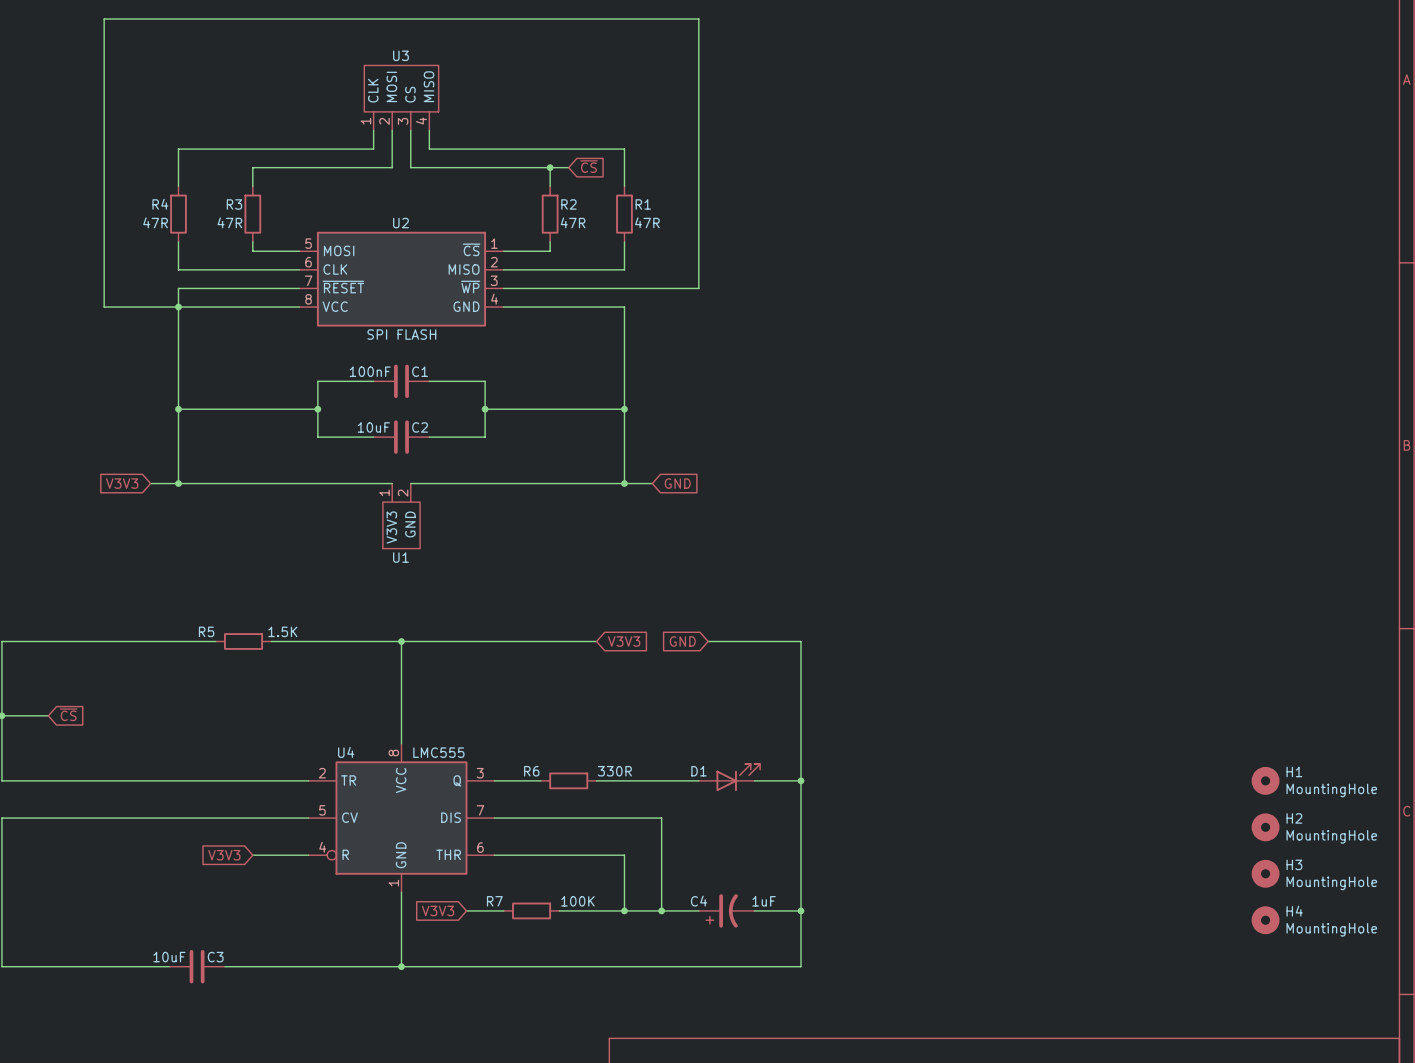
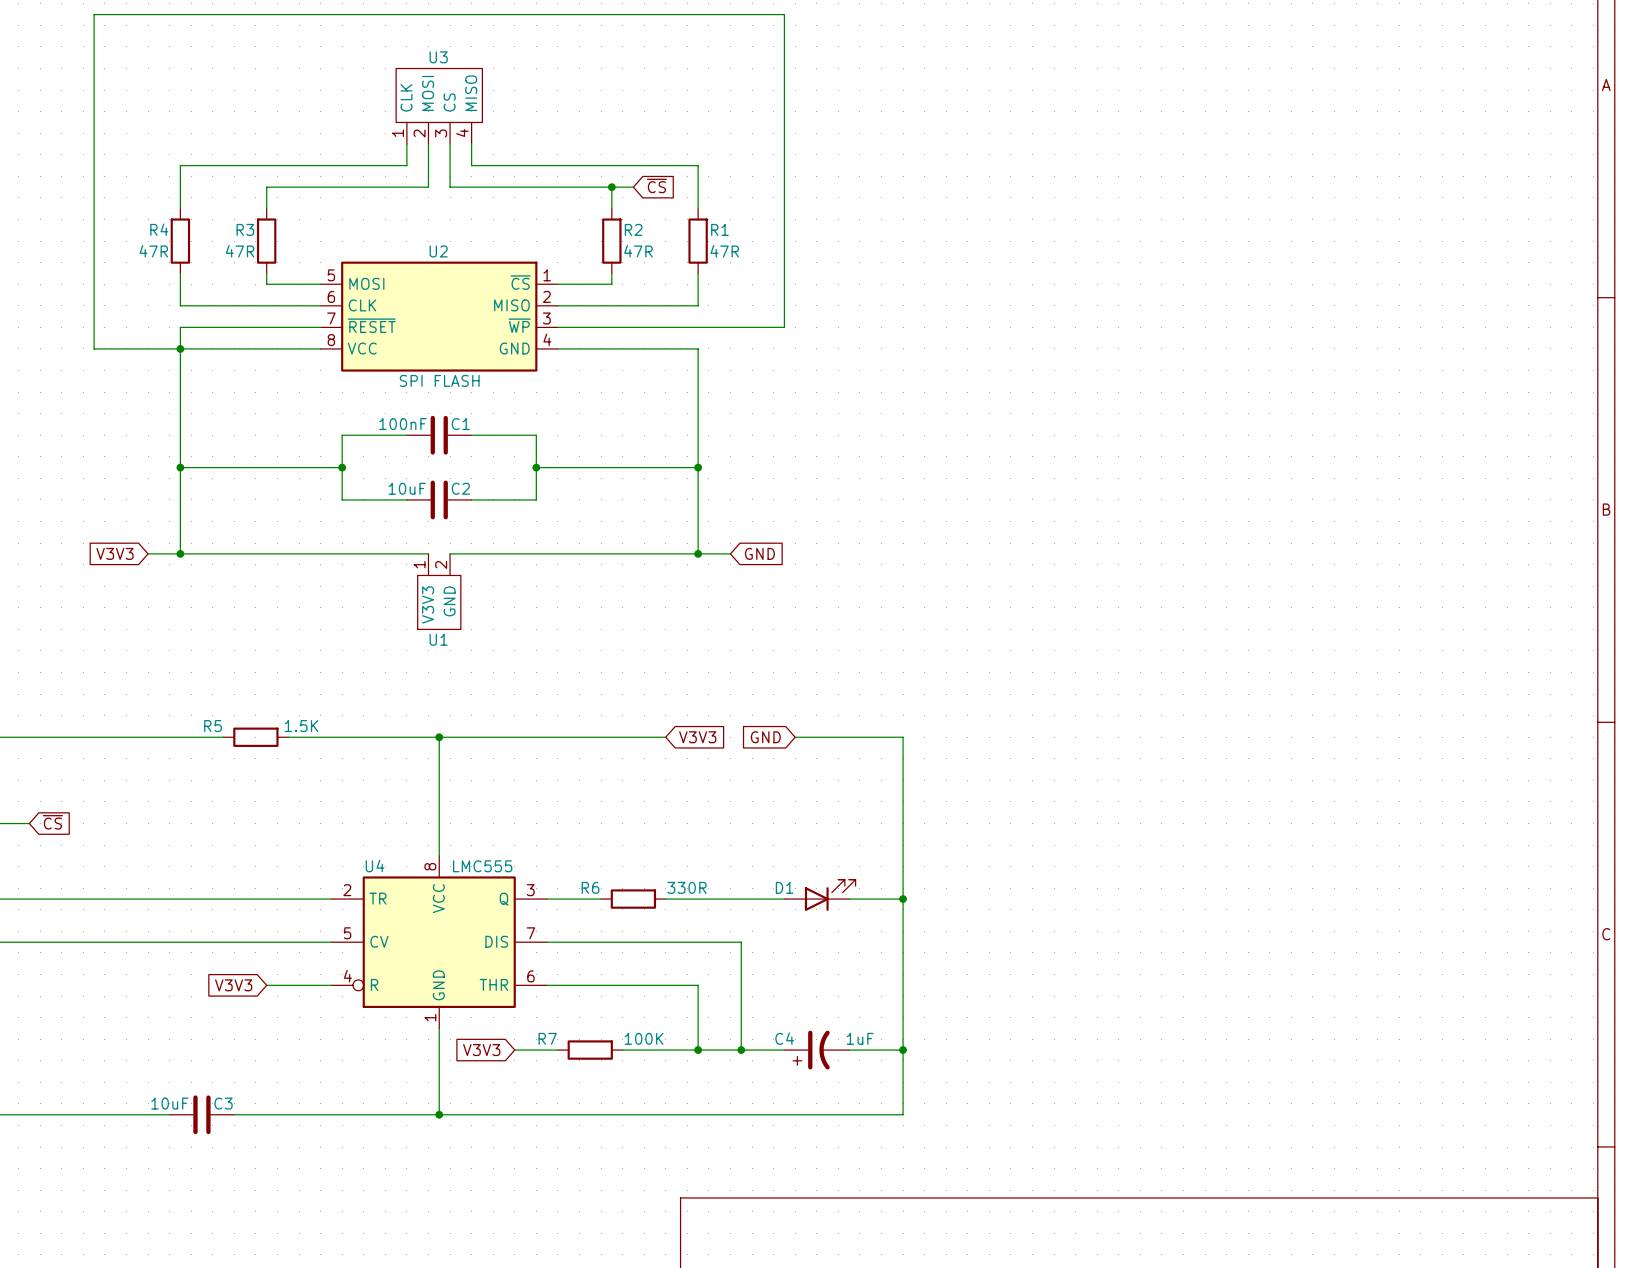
H1: MountingHole (1265, 780) -> none
H2: MountingHole (1265, 827) -> none
H3: MountingHole (1265, 873) -> none
H4: MountingHole (1265, 920) -> none

